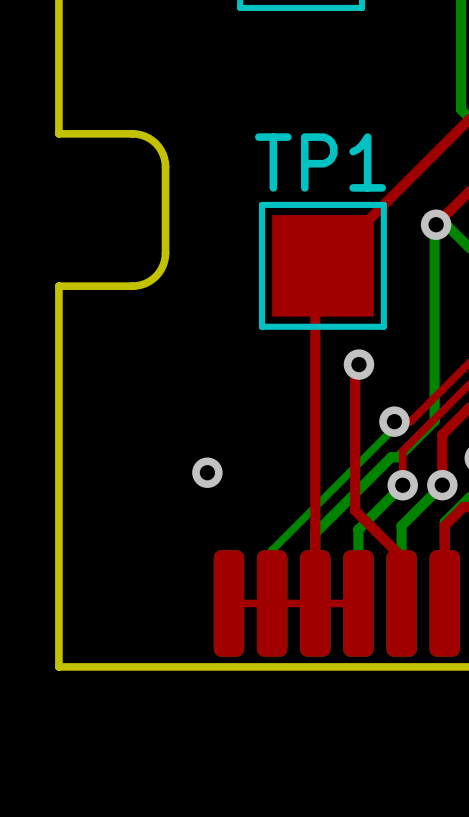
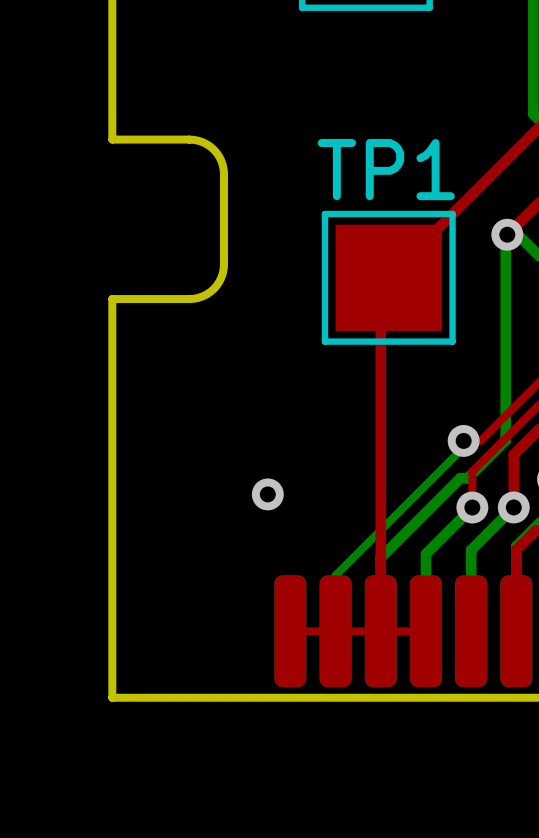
top track: (358, 364) (355, 368) (355, 510) (401, 557) (401, 603) -> none
via: (358, 364) -> none

